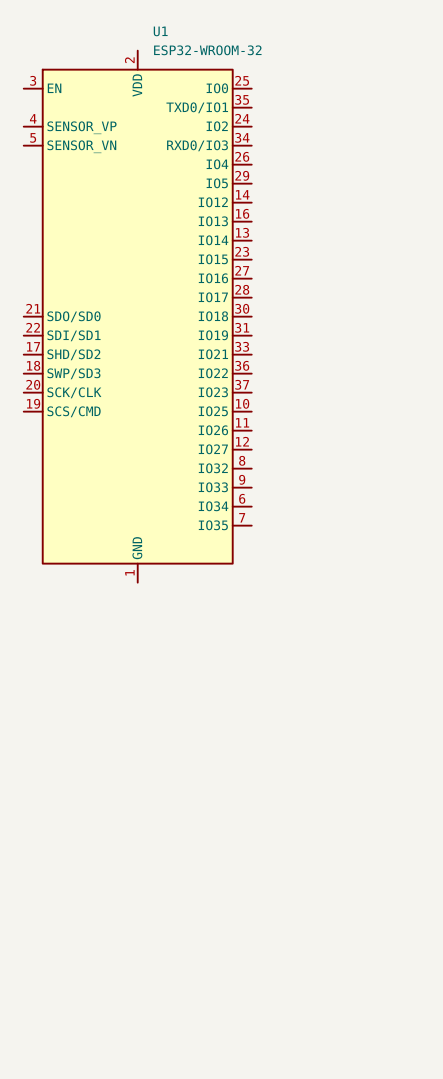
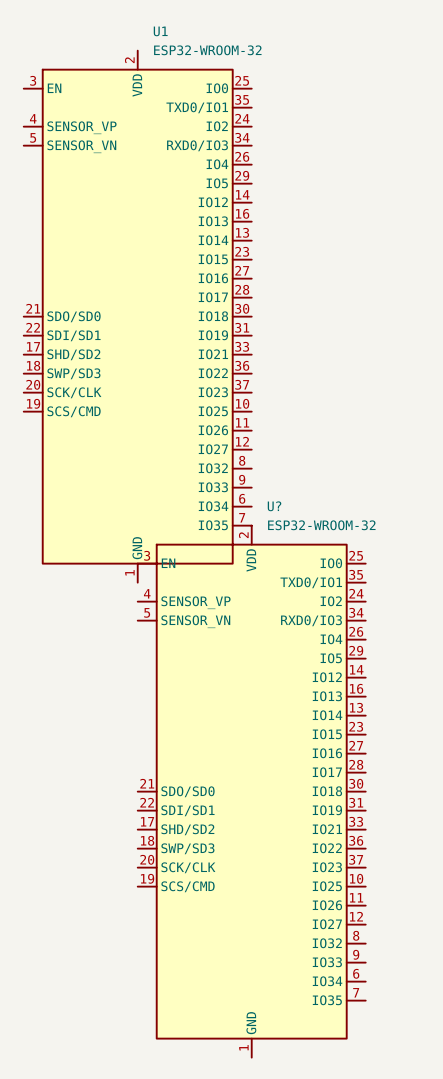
U?: none -> ESP32-WROOM-32 (251, 791)

